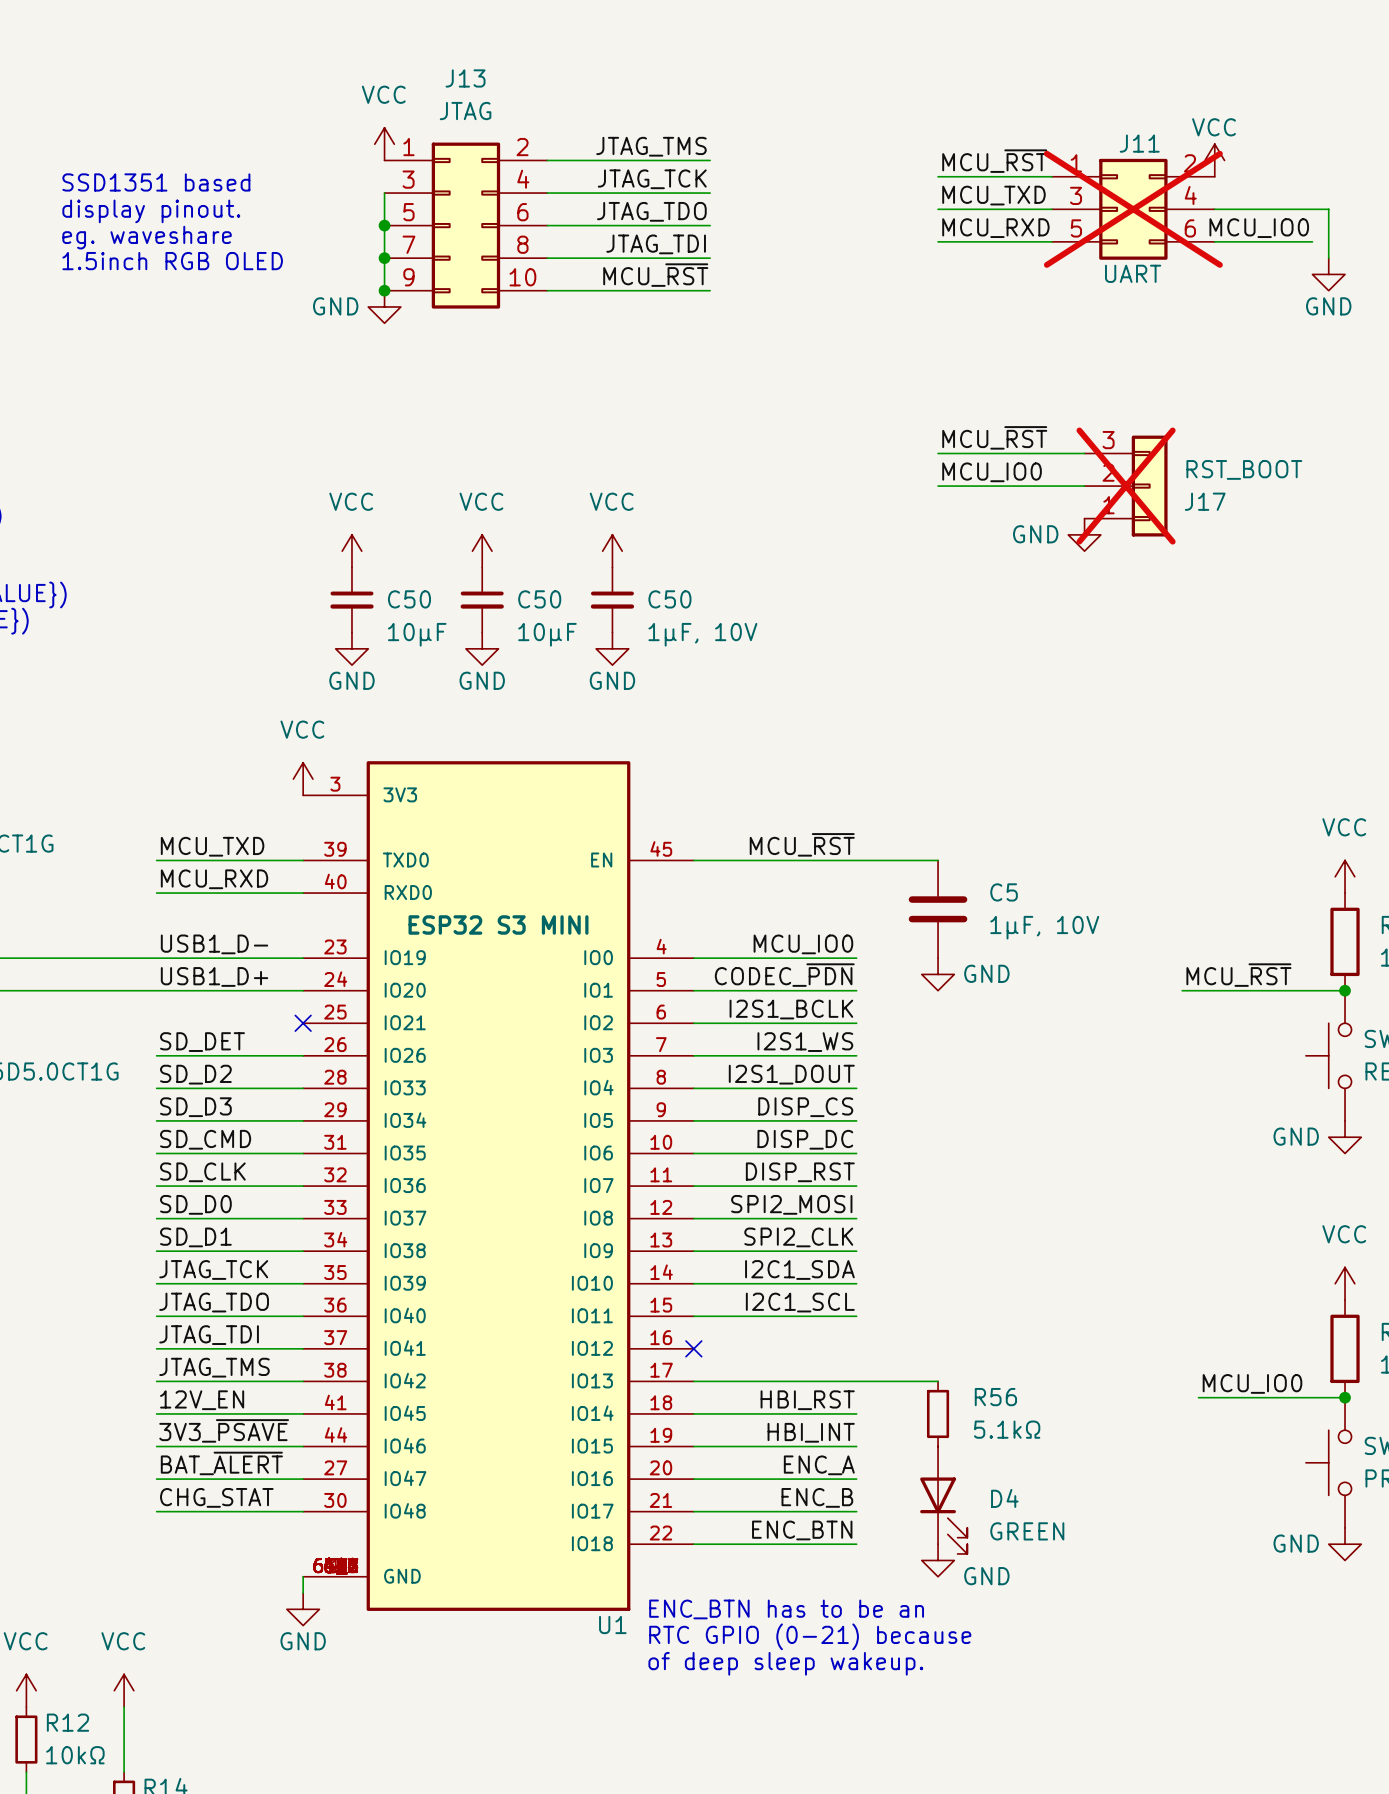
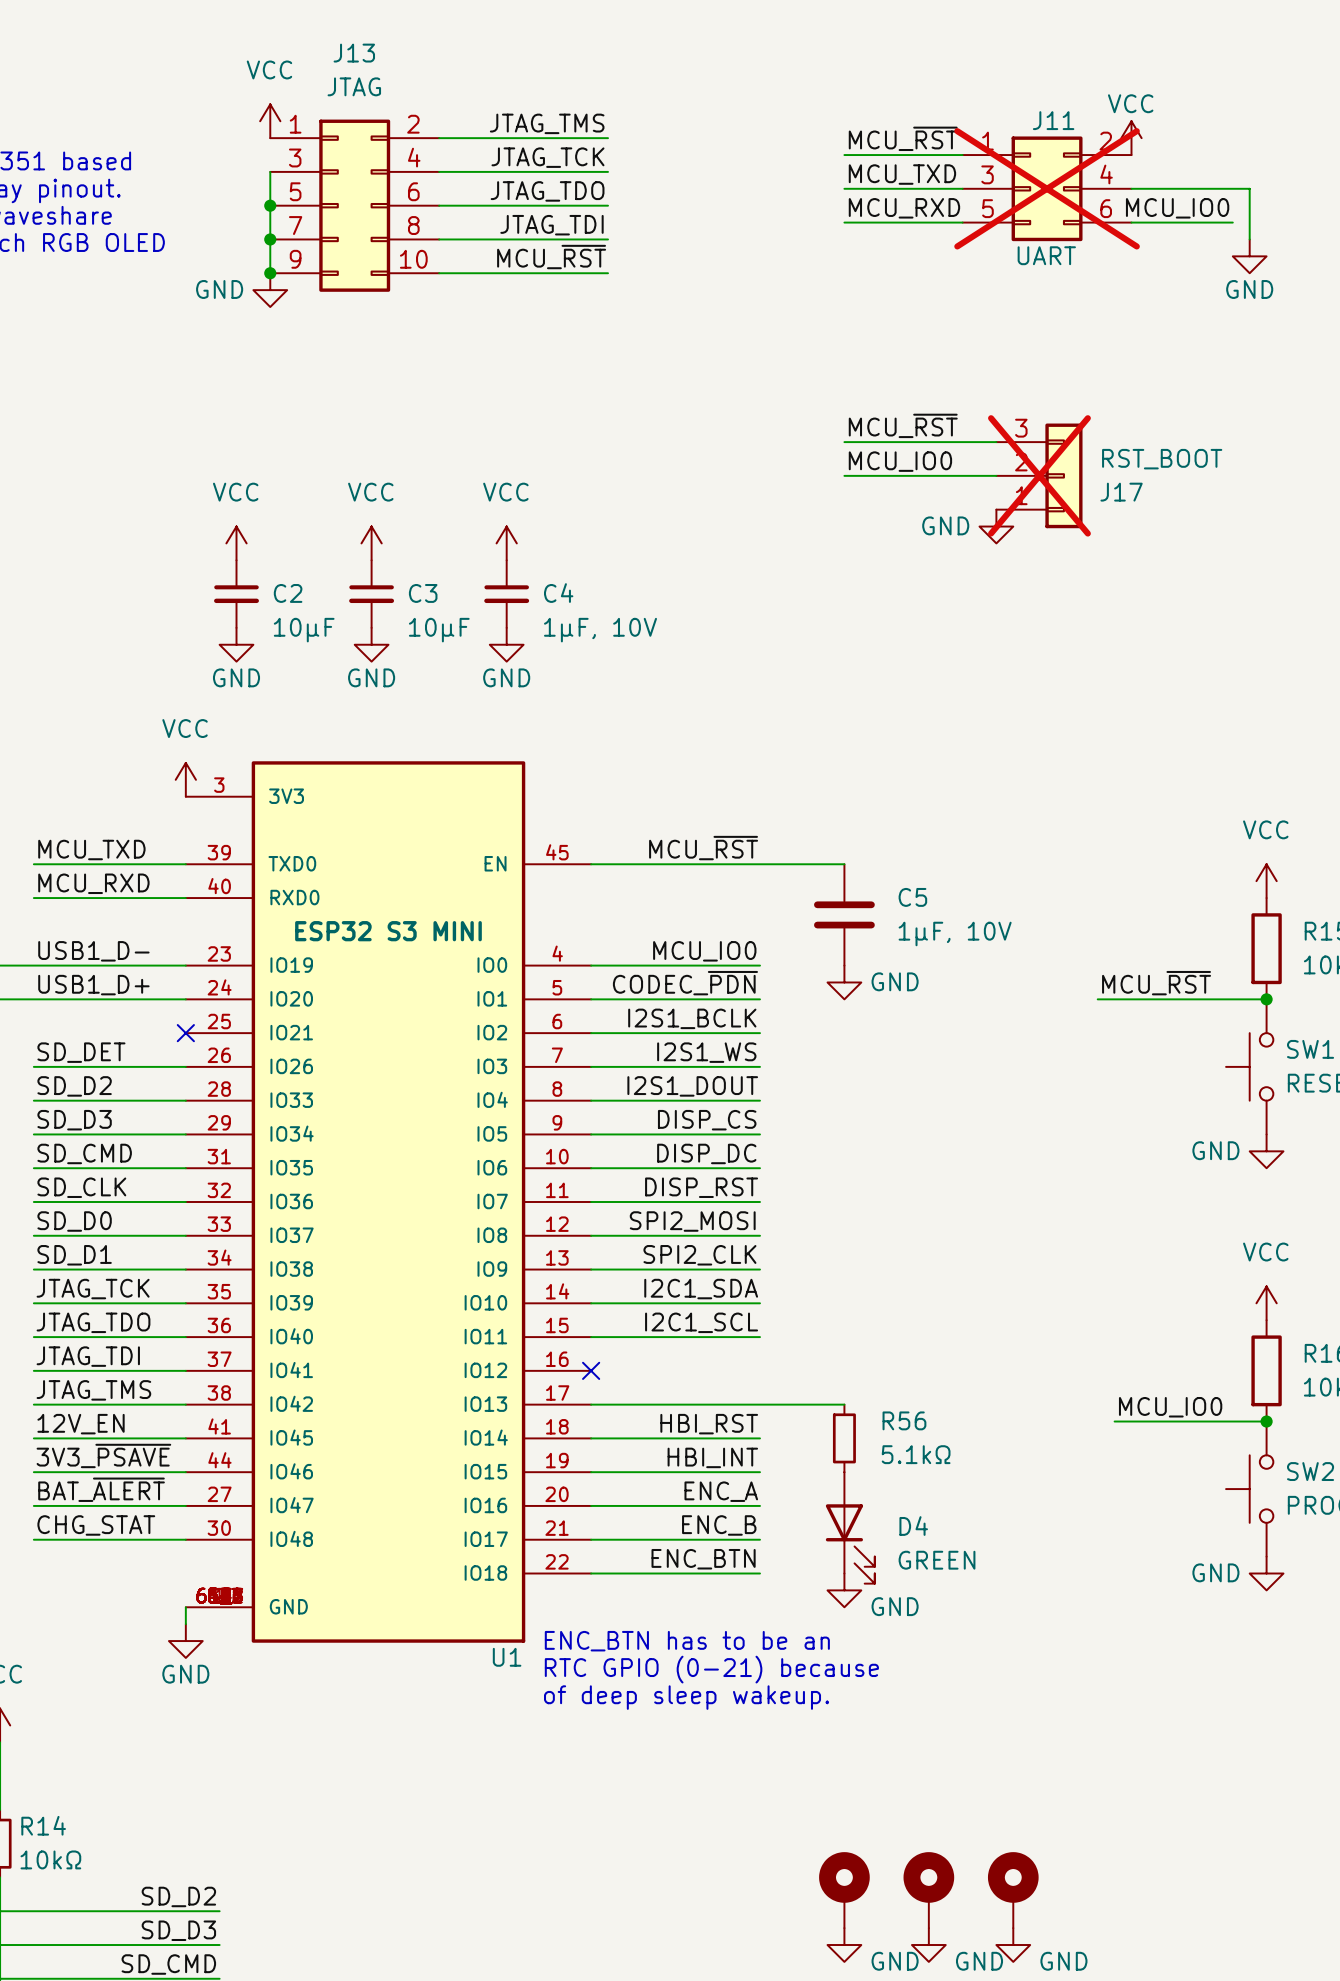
C50 name: C50 (409, 599) -> C2 (288, 593)
C50 name: C50 (539, 599) -> C3 (423, 593)
C50 name: C50 (669, 599) -> C4 (558, 593)

